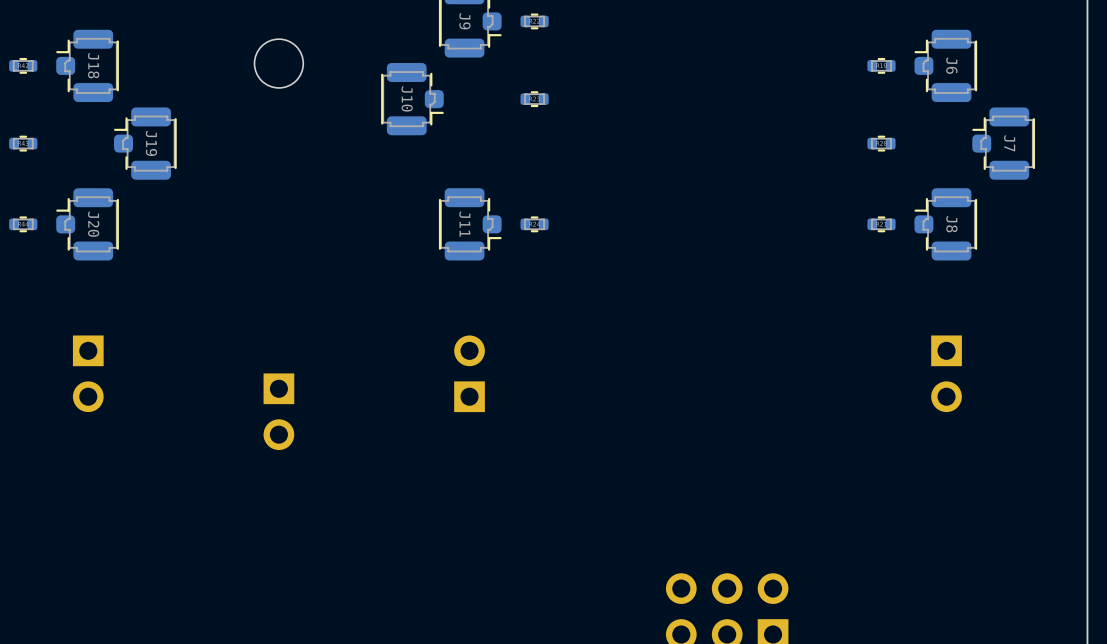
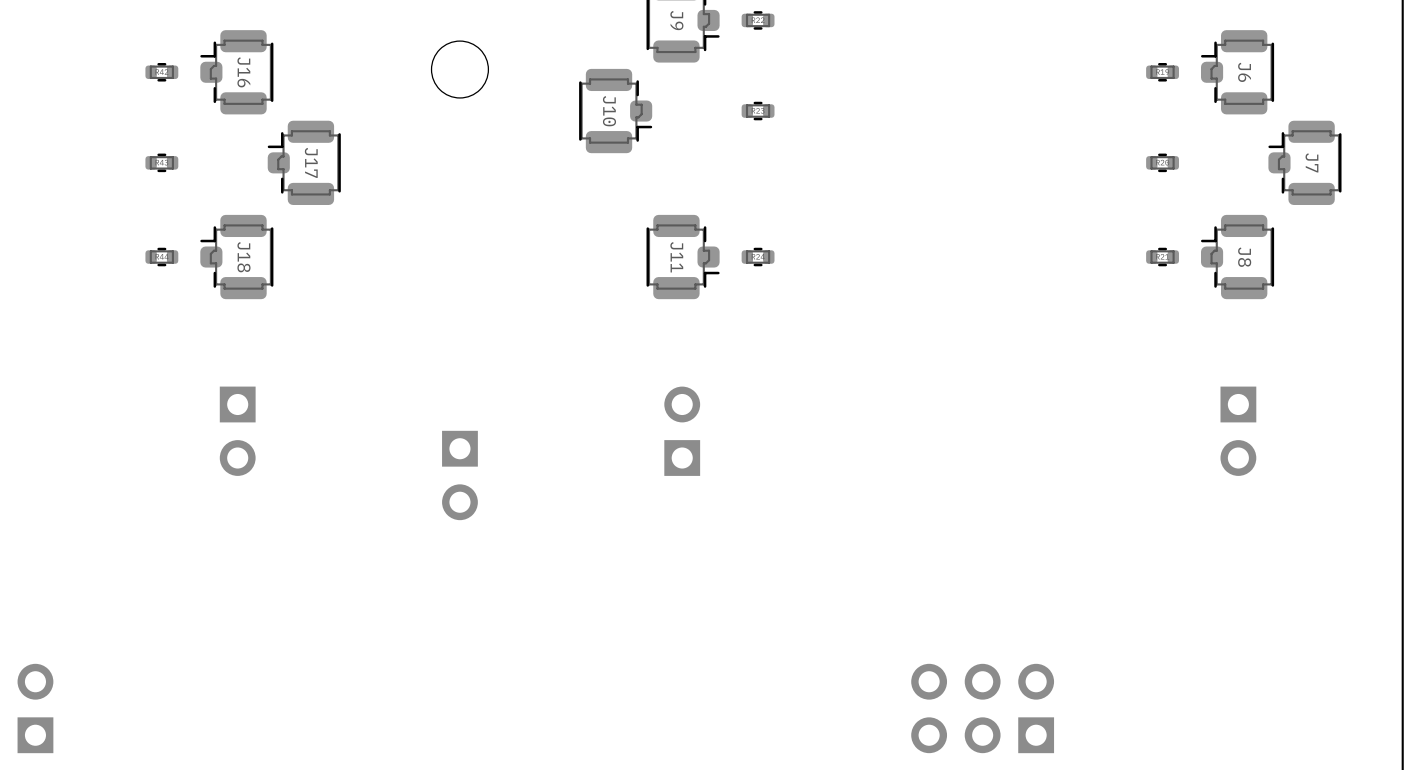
J18 name: J18 (93, 65) -> J16 (243, 72)
J19 name: J19 (151, 143) -> J17 (311, 162)
J20 name: J20 (93, 224) -> J18 (243, 257)

